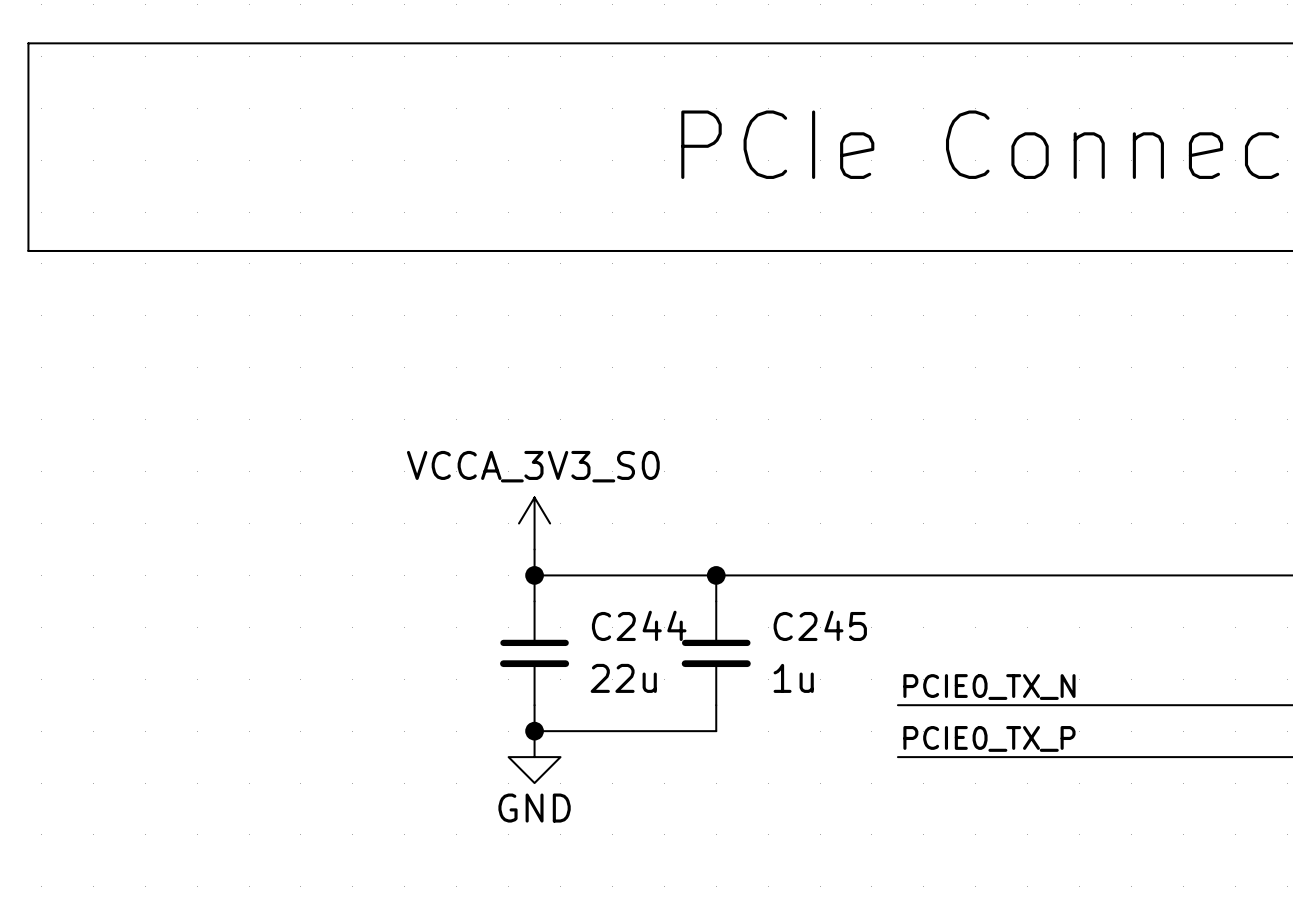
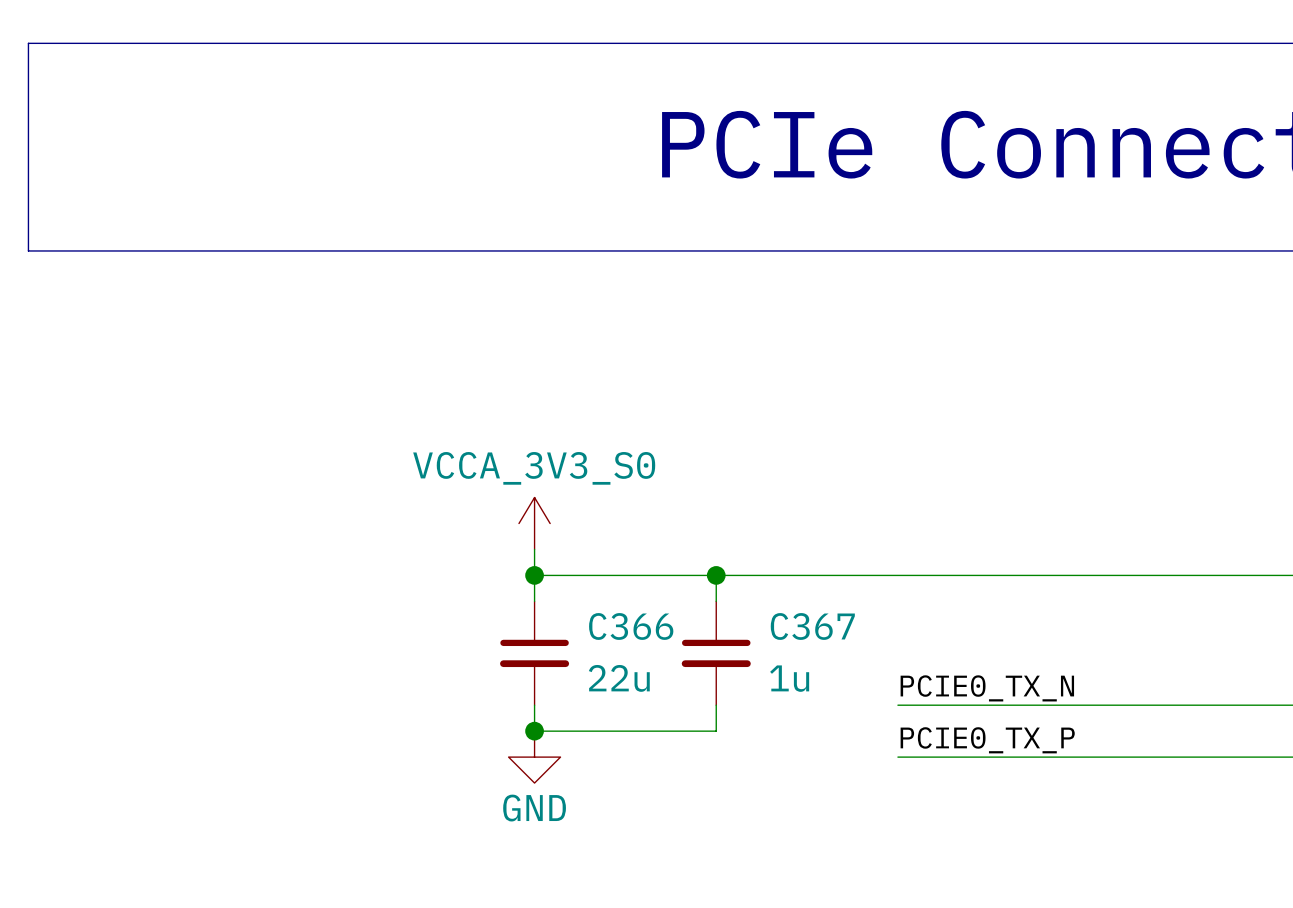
C244 name: C244 (639, 625) -> C366 (631, 626)
C245 name: C245 (820, 625) -> C367 (812, 626)

